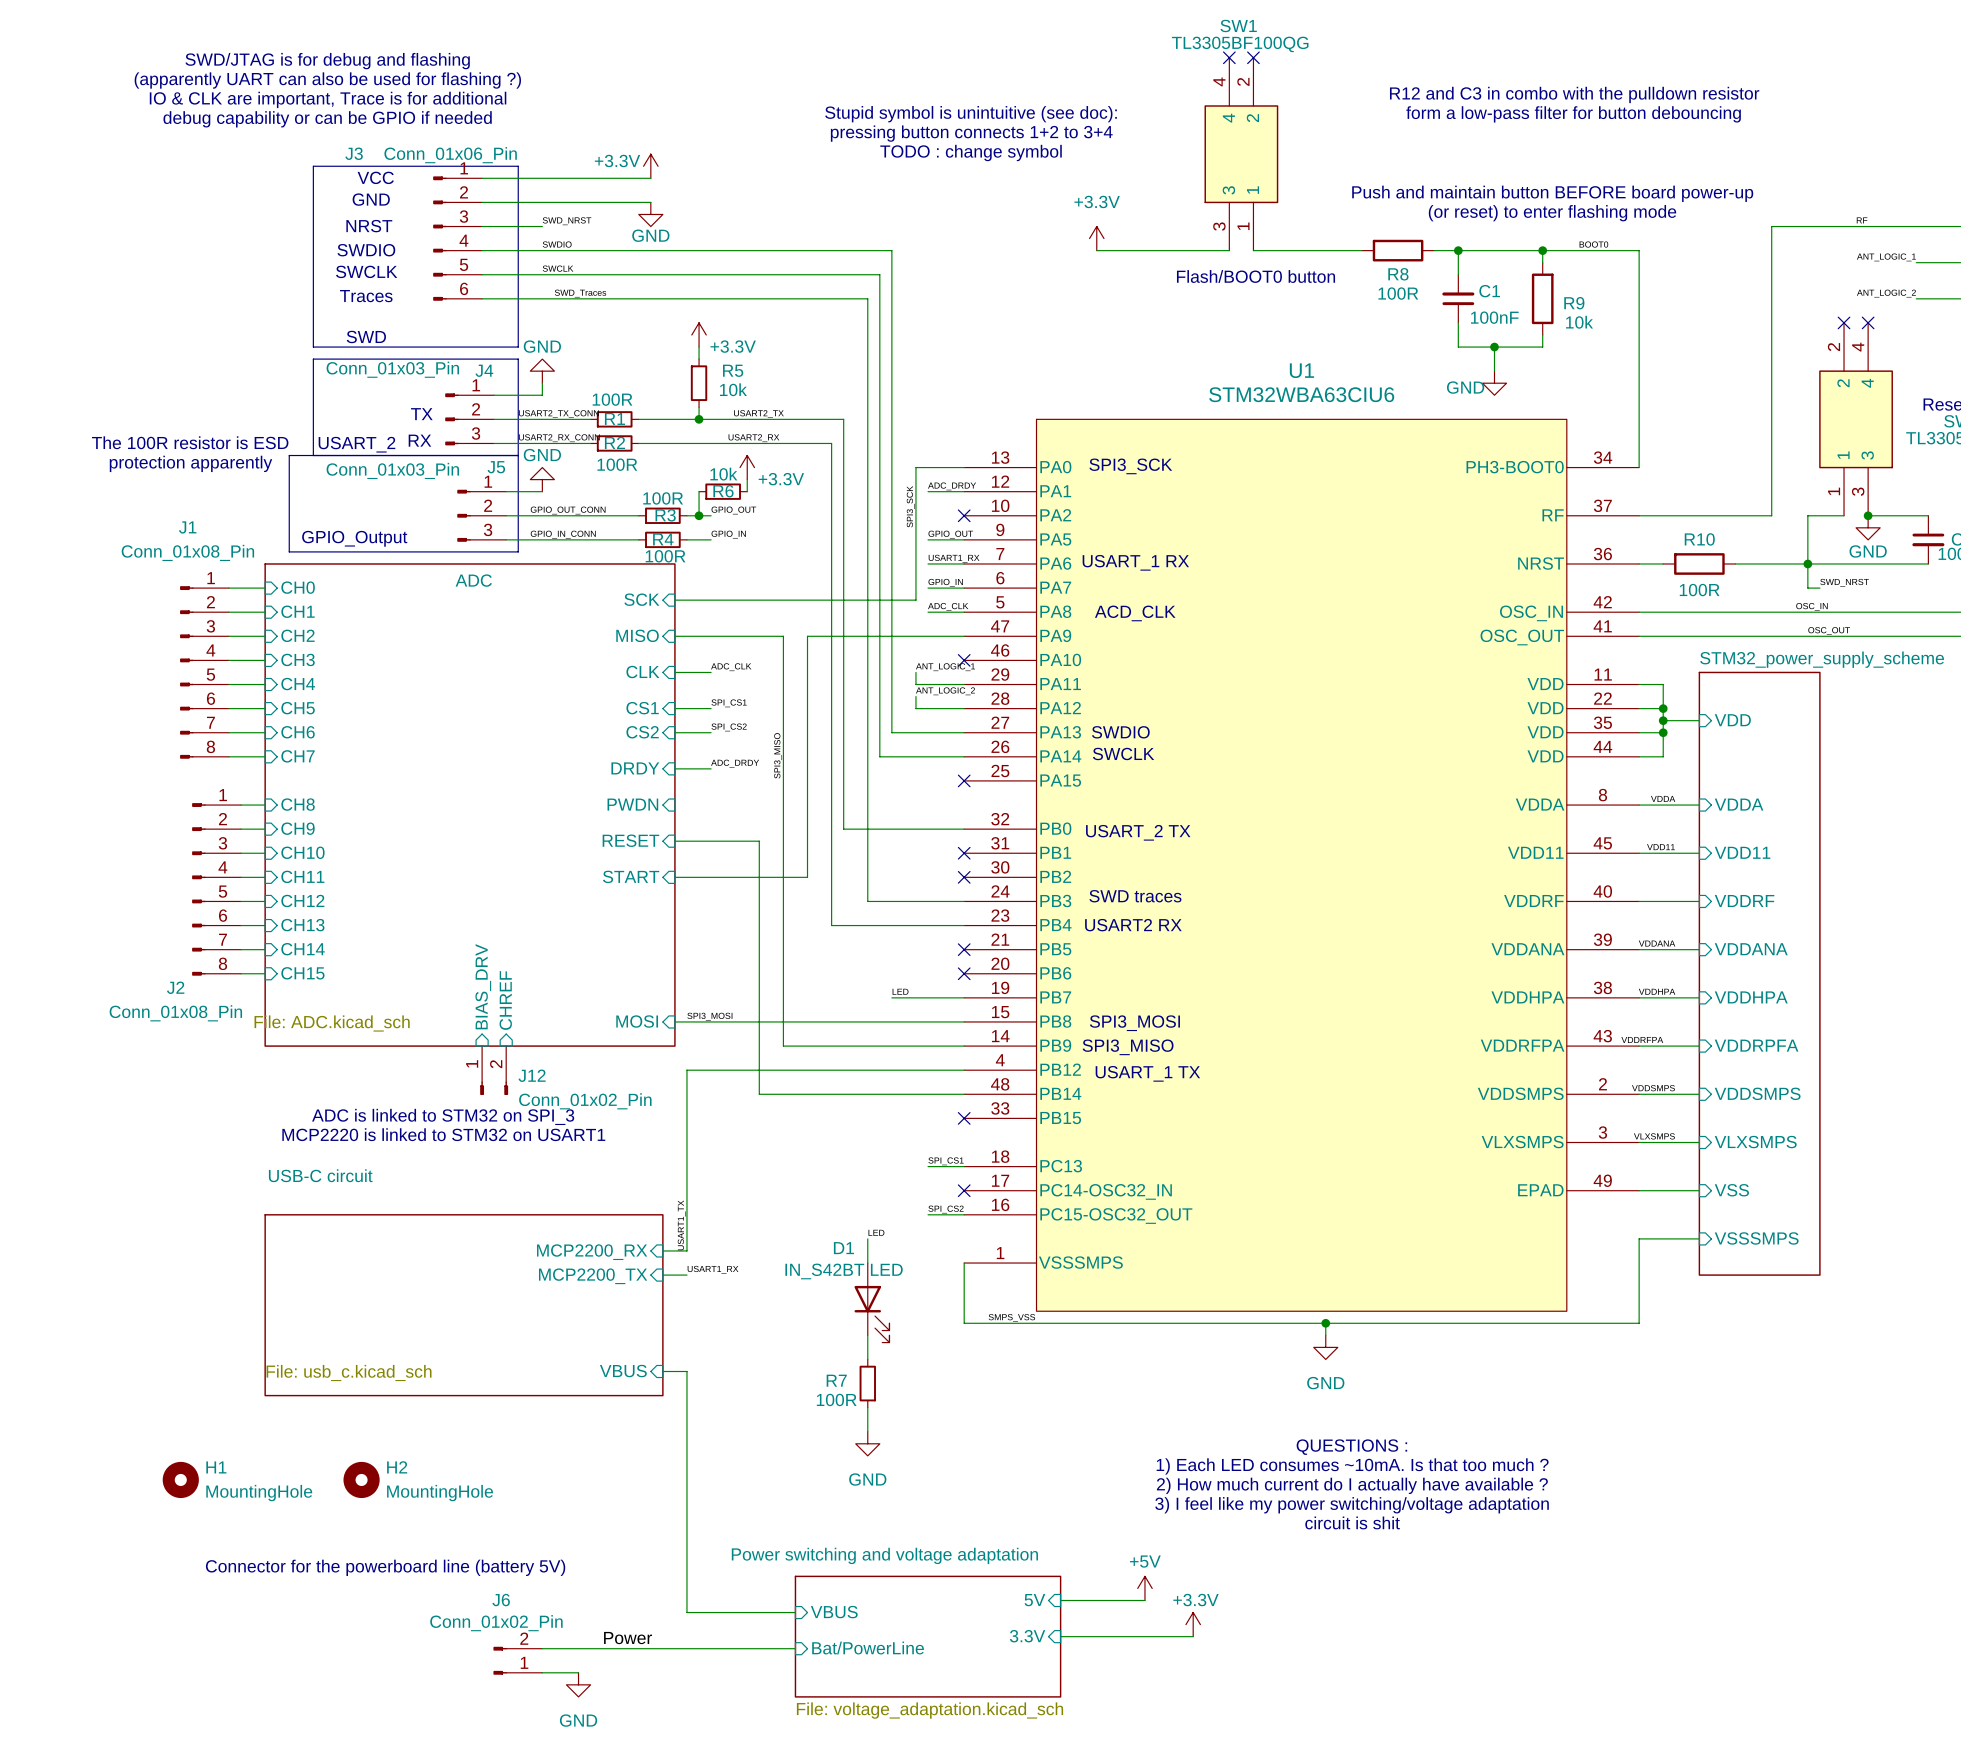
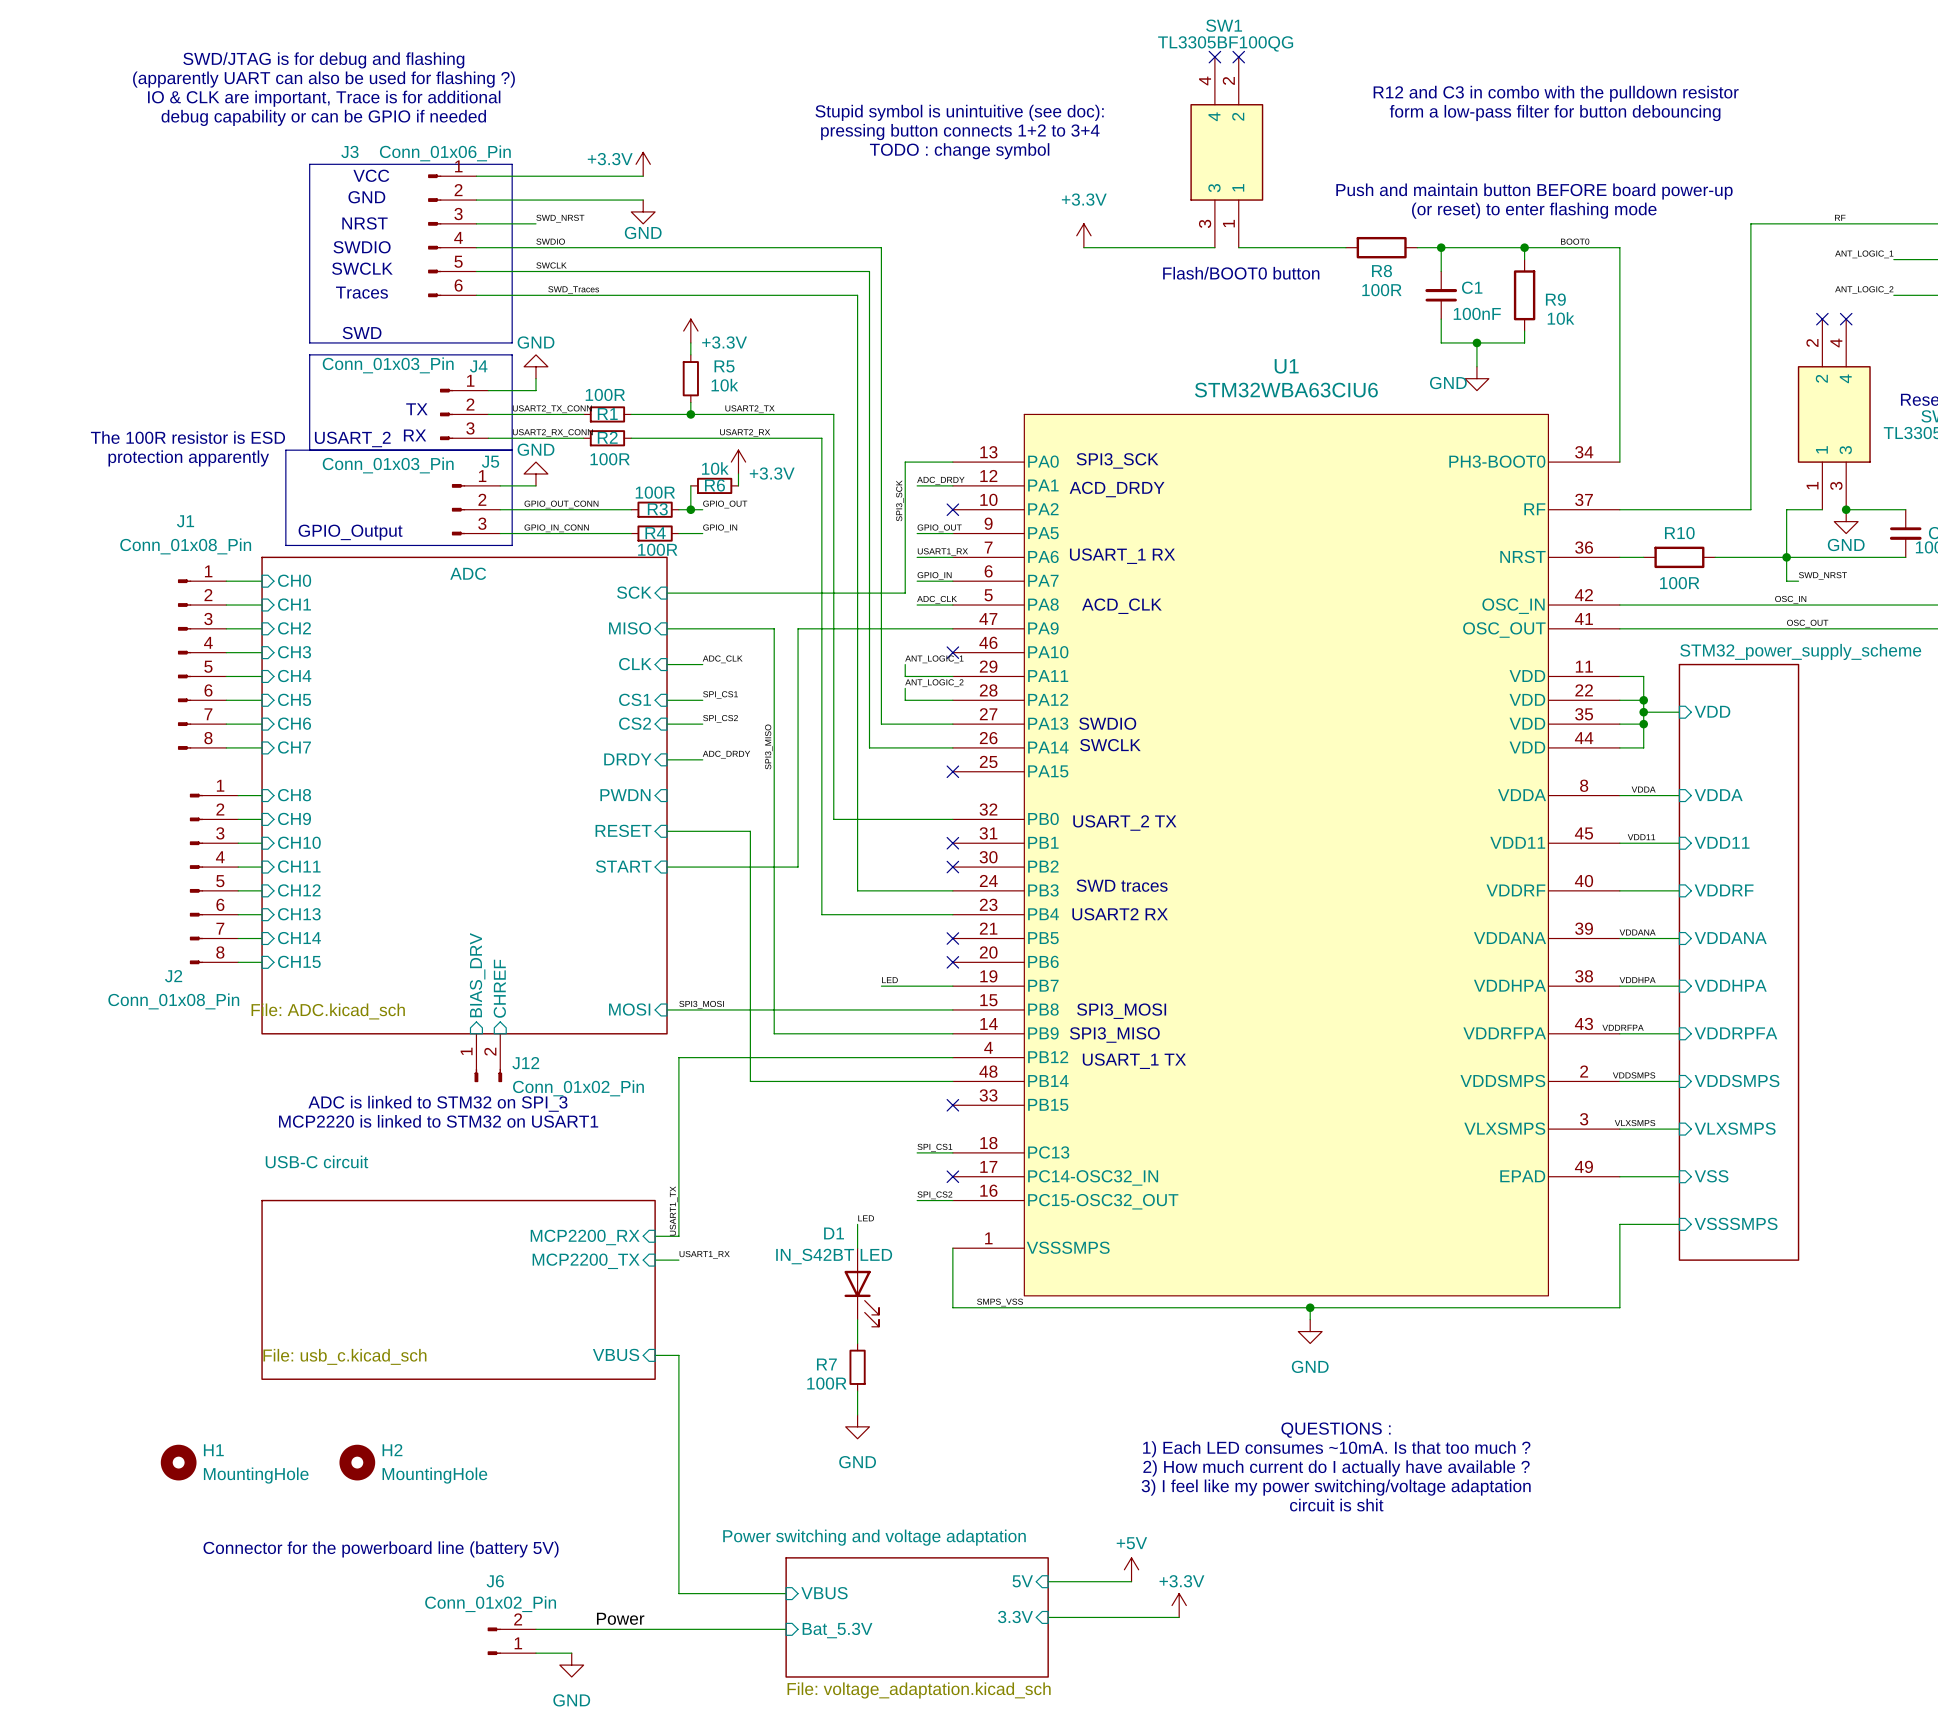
text: none -> ACD_DRDY (1117, 489)
sheet pin: Bat/PowerLine (868, 1648) -> Bat_5.3V (837, 1630)

